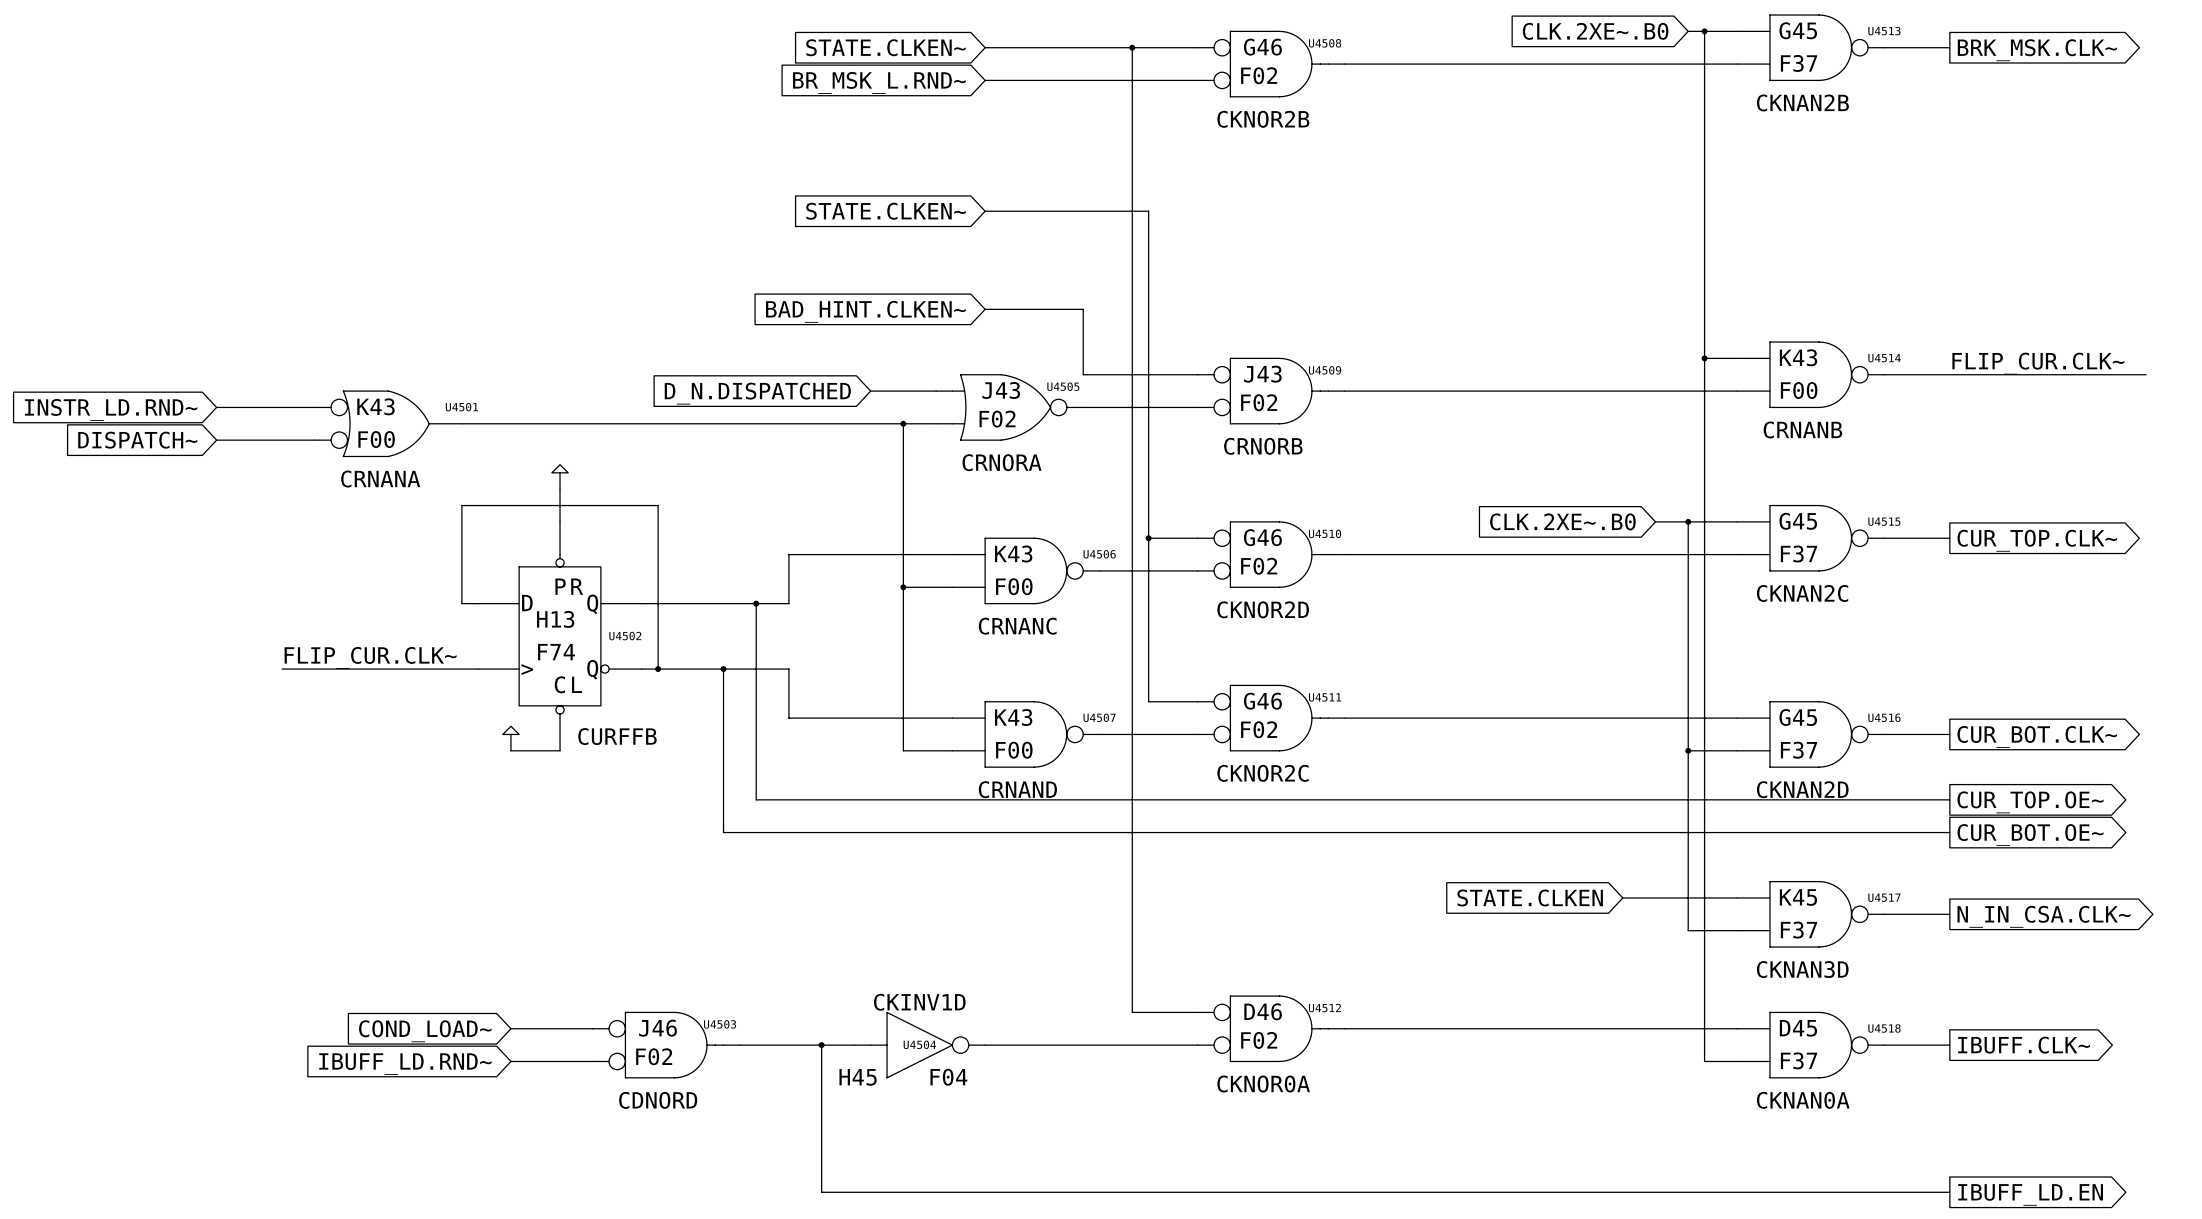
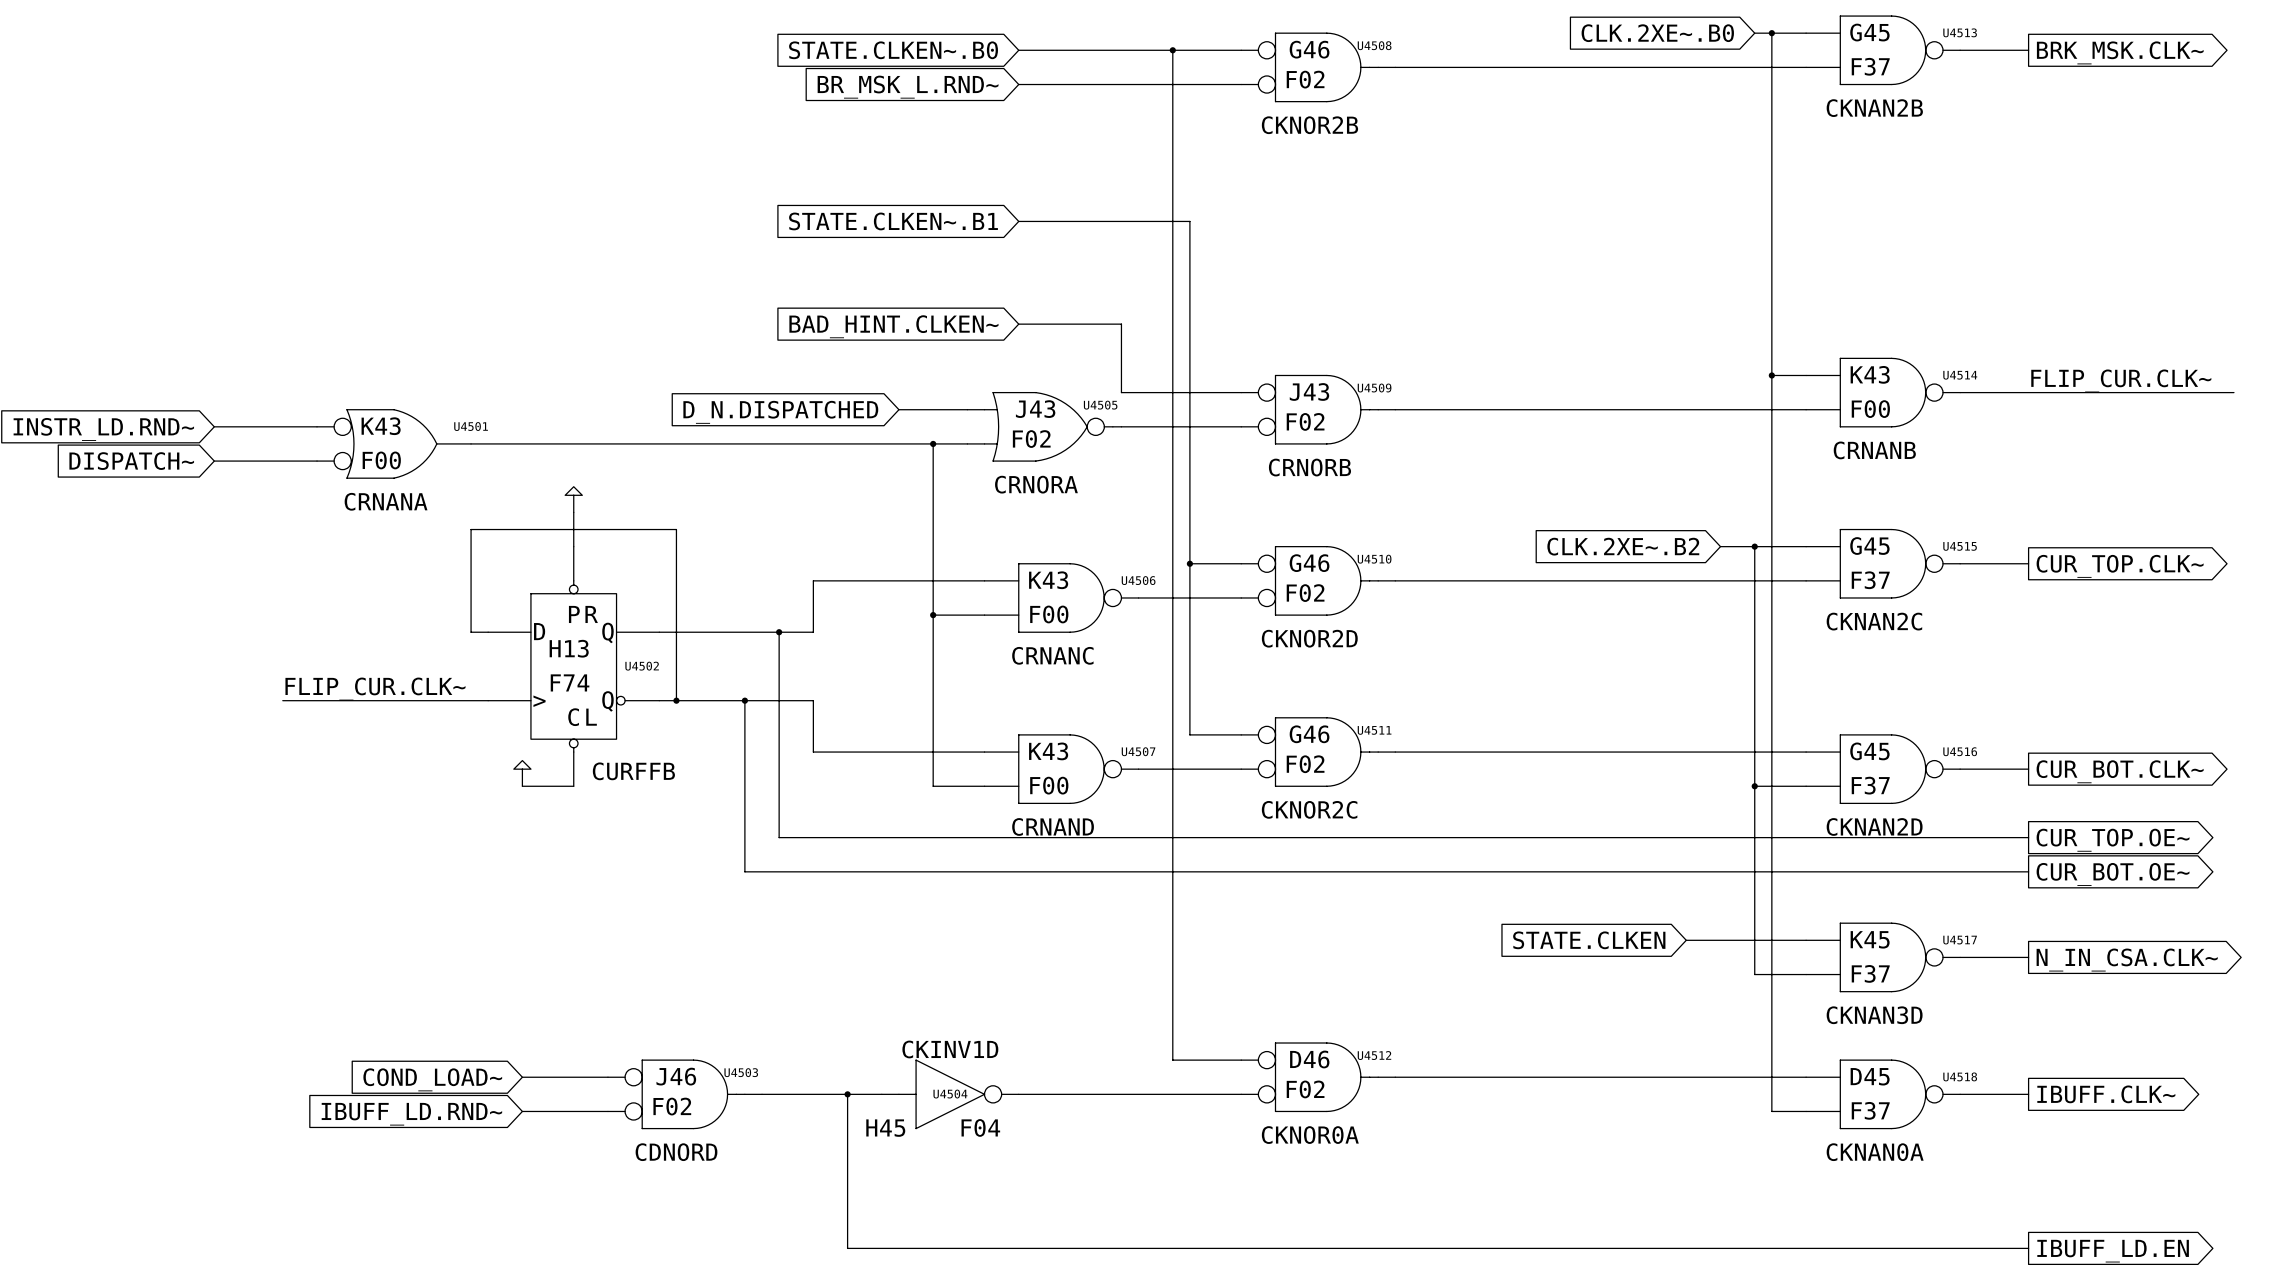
global label: STATE.CLKEN~ (886, 47) -> STATE.CLKEN~.B0 (893, 50)
global label: STATE.CLKEN~ (886, 211) -> STATE.CLKEN~.B1 (893, 221)
global label: CLK.2XE~.B0 (1562, 521) -> CLK.2XE~.B2 (1623, 546)

